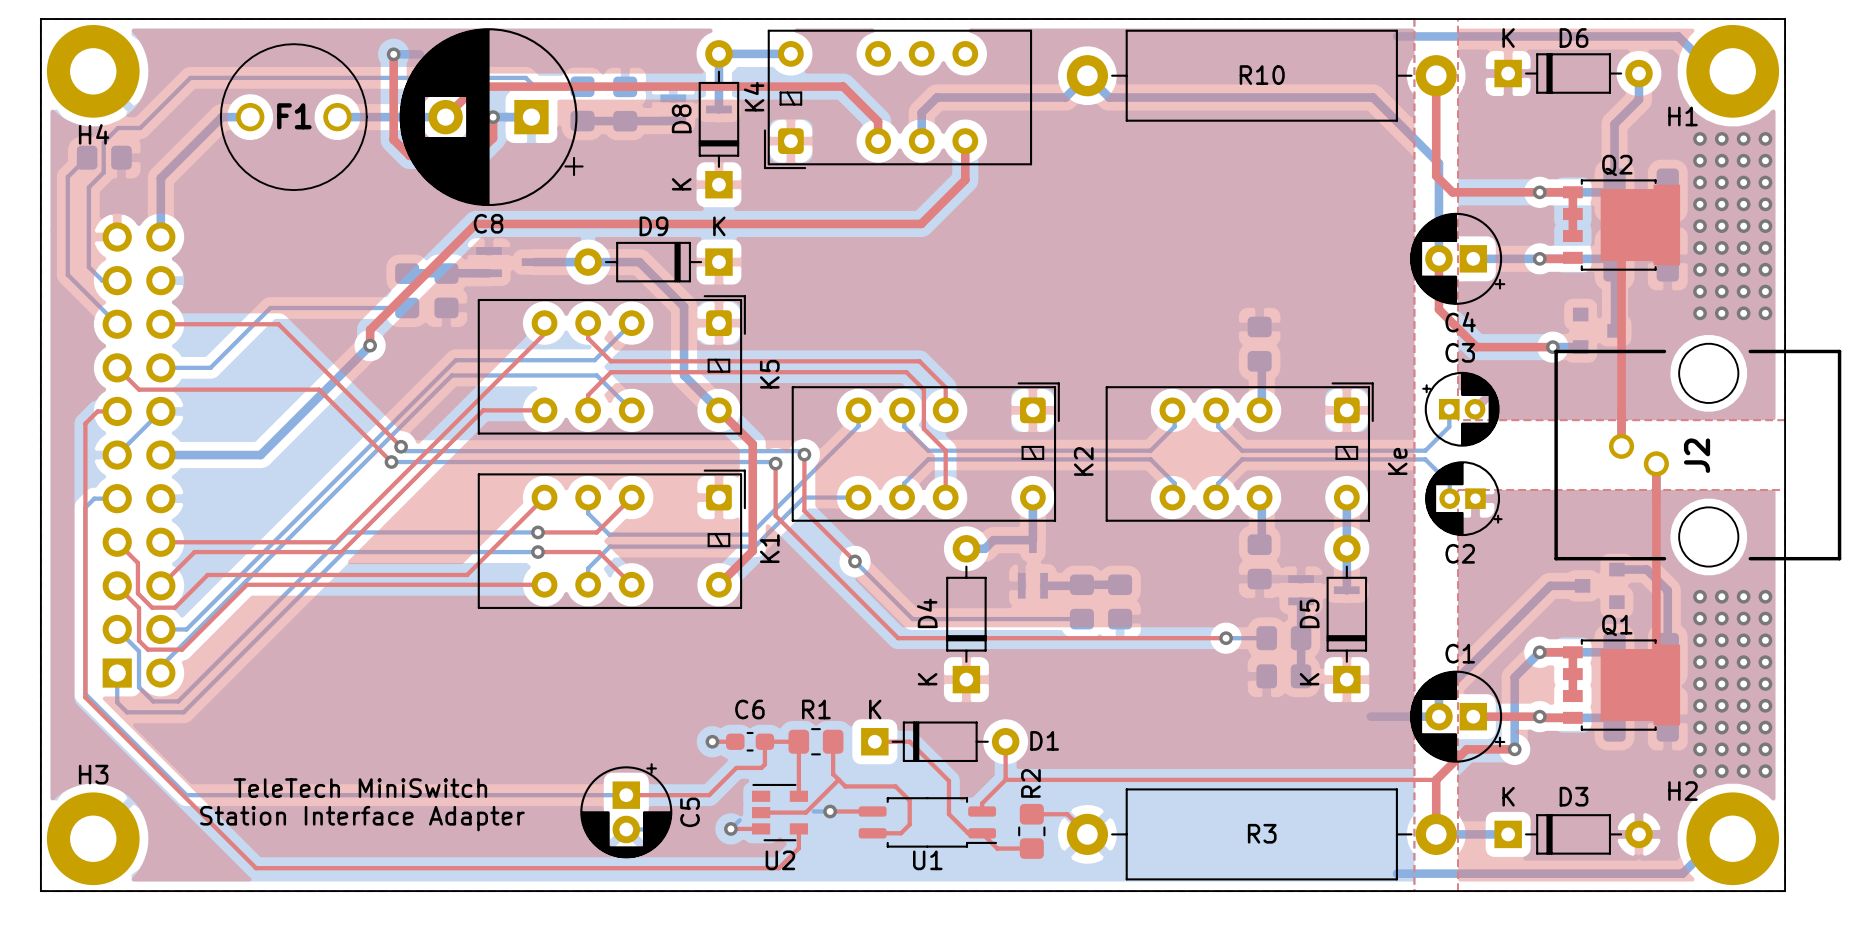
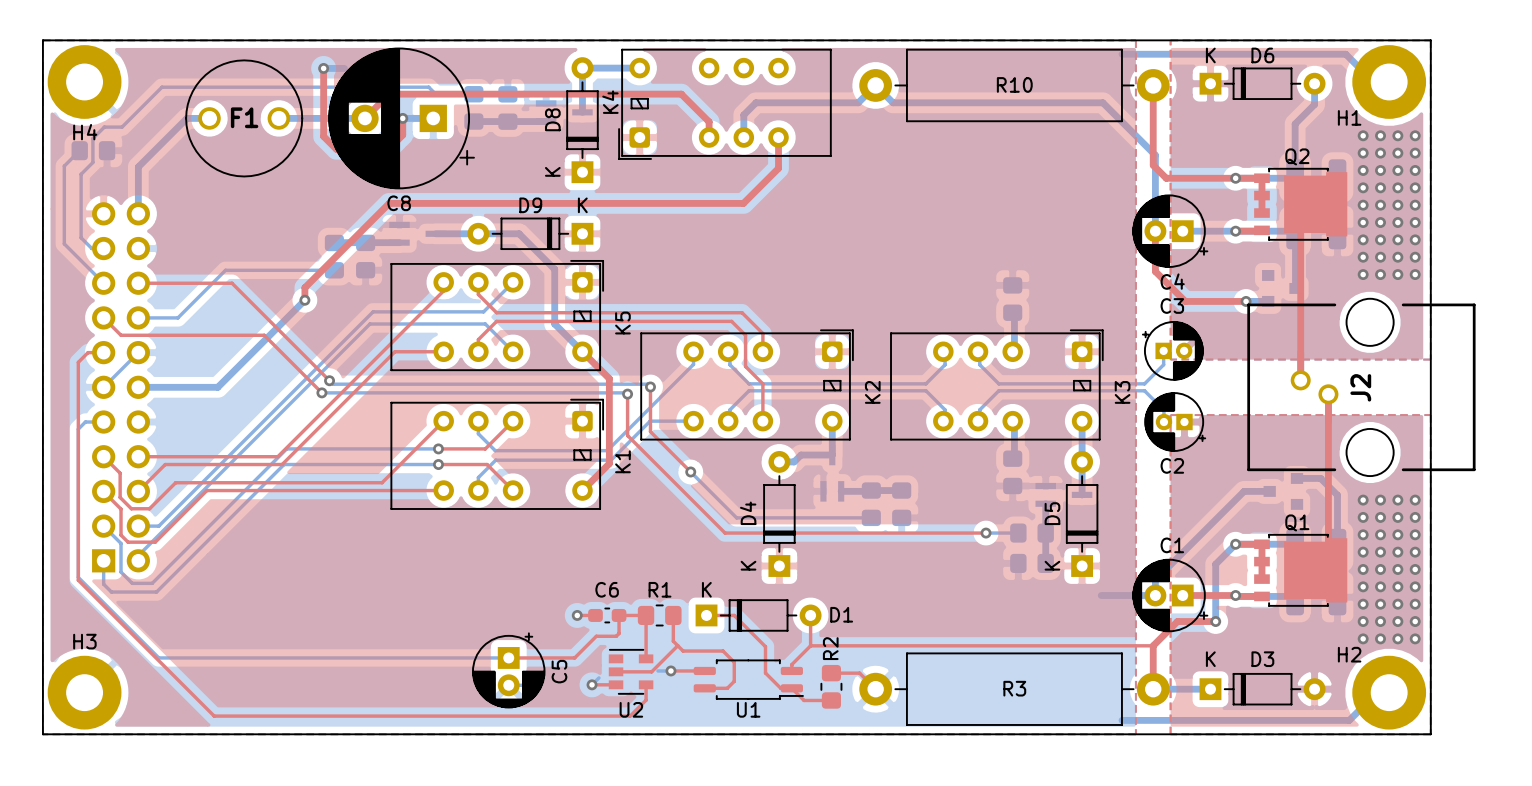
Ke name: Ke (1397, 461) -> K3 (1122, 392)
text: TeleTech MiniSwitch (360, 788) -> none
text: Station Interface Adapter (362, 818) -> none

